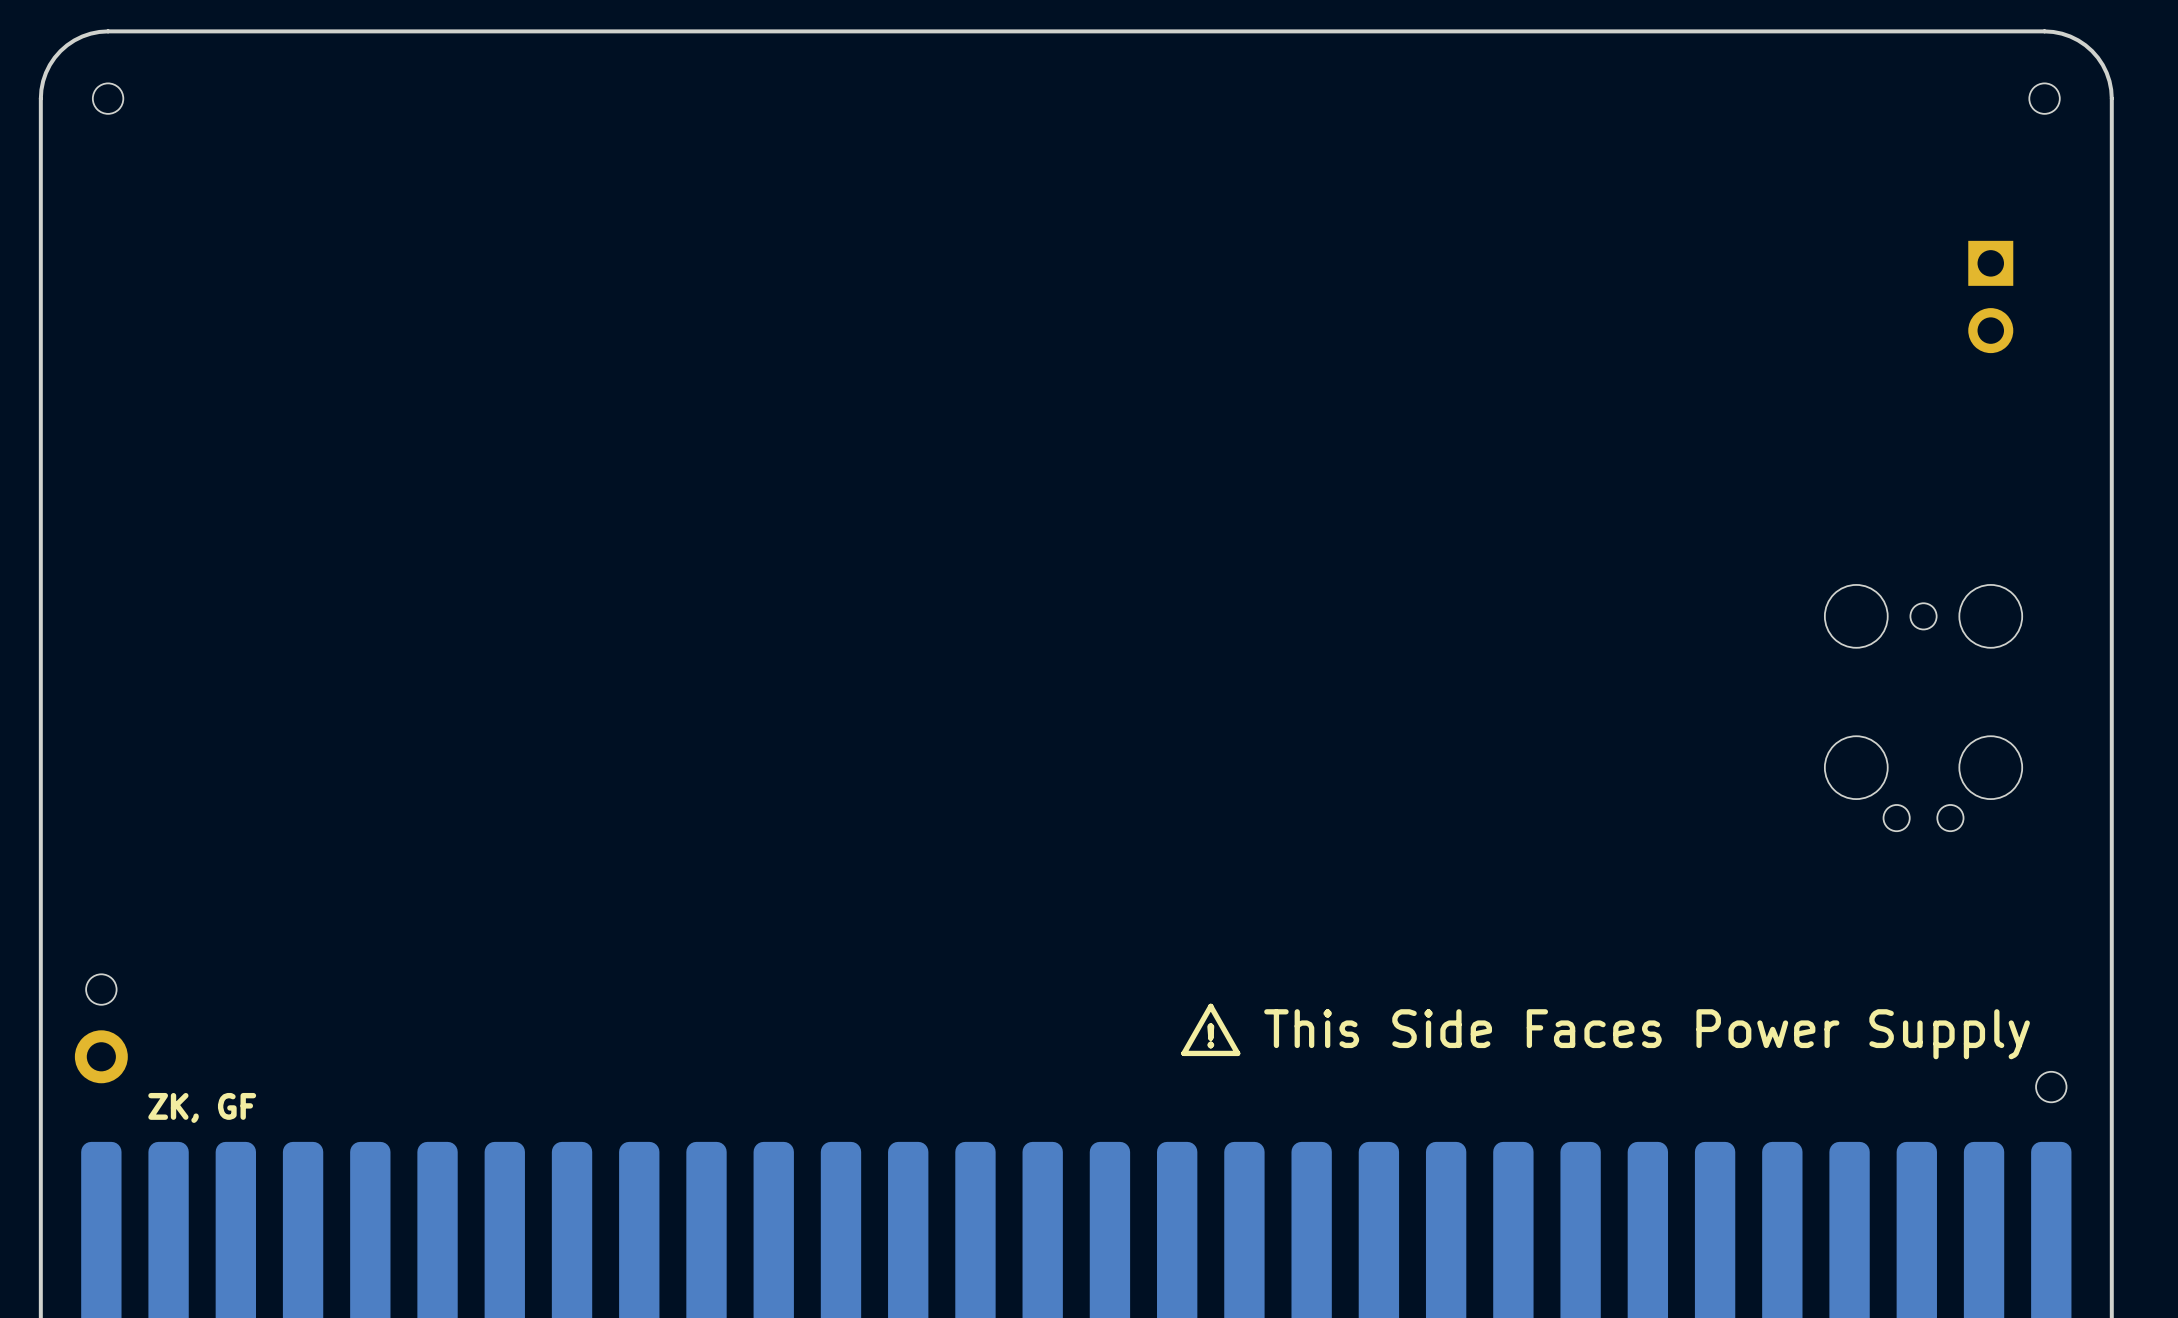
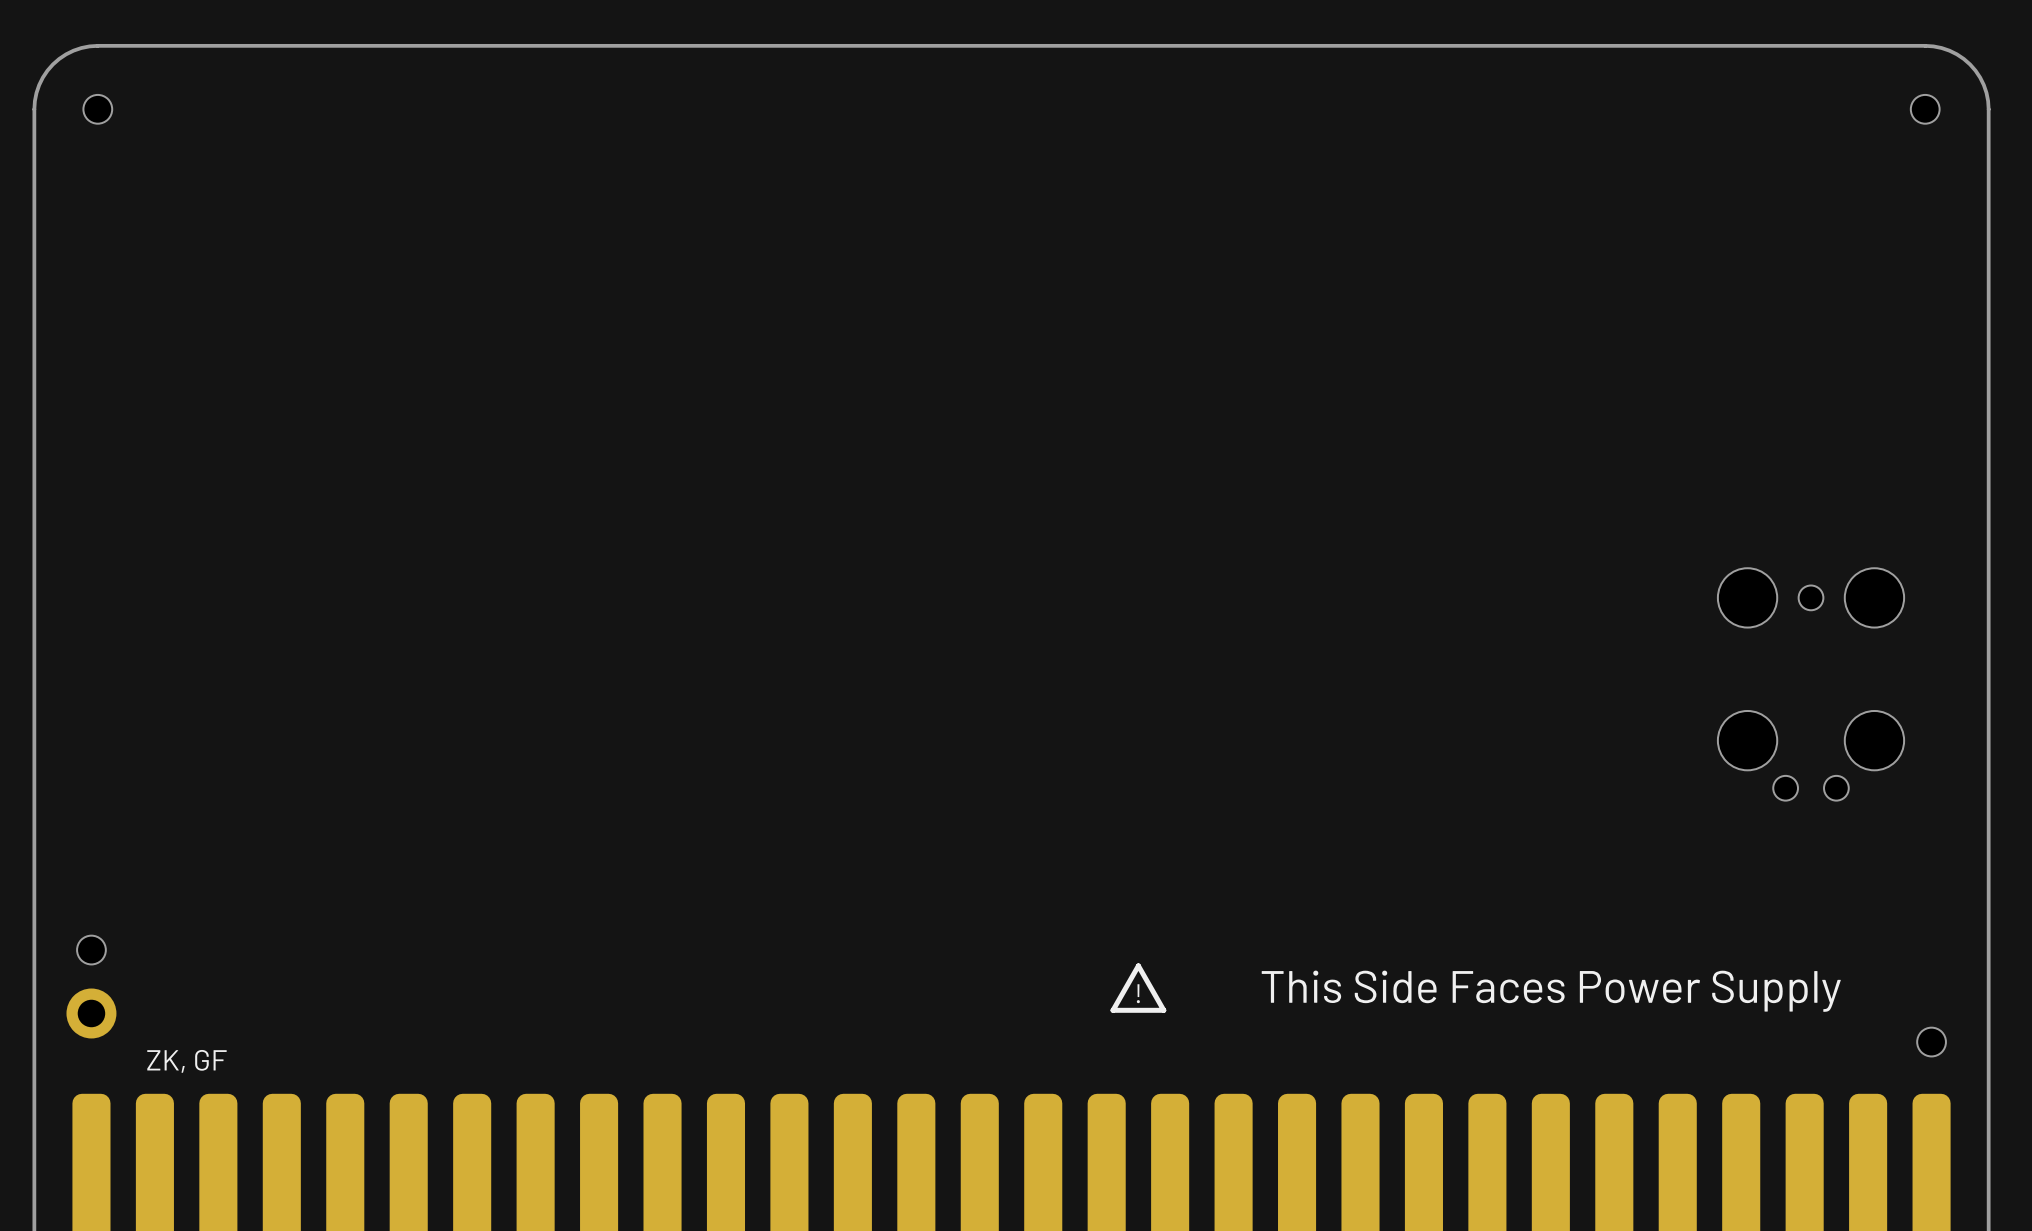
part: (1990, 296) -> none

